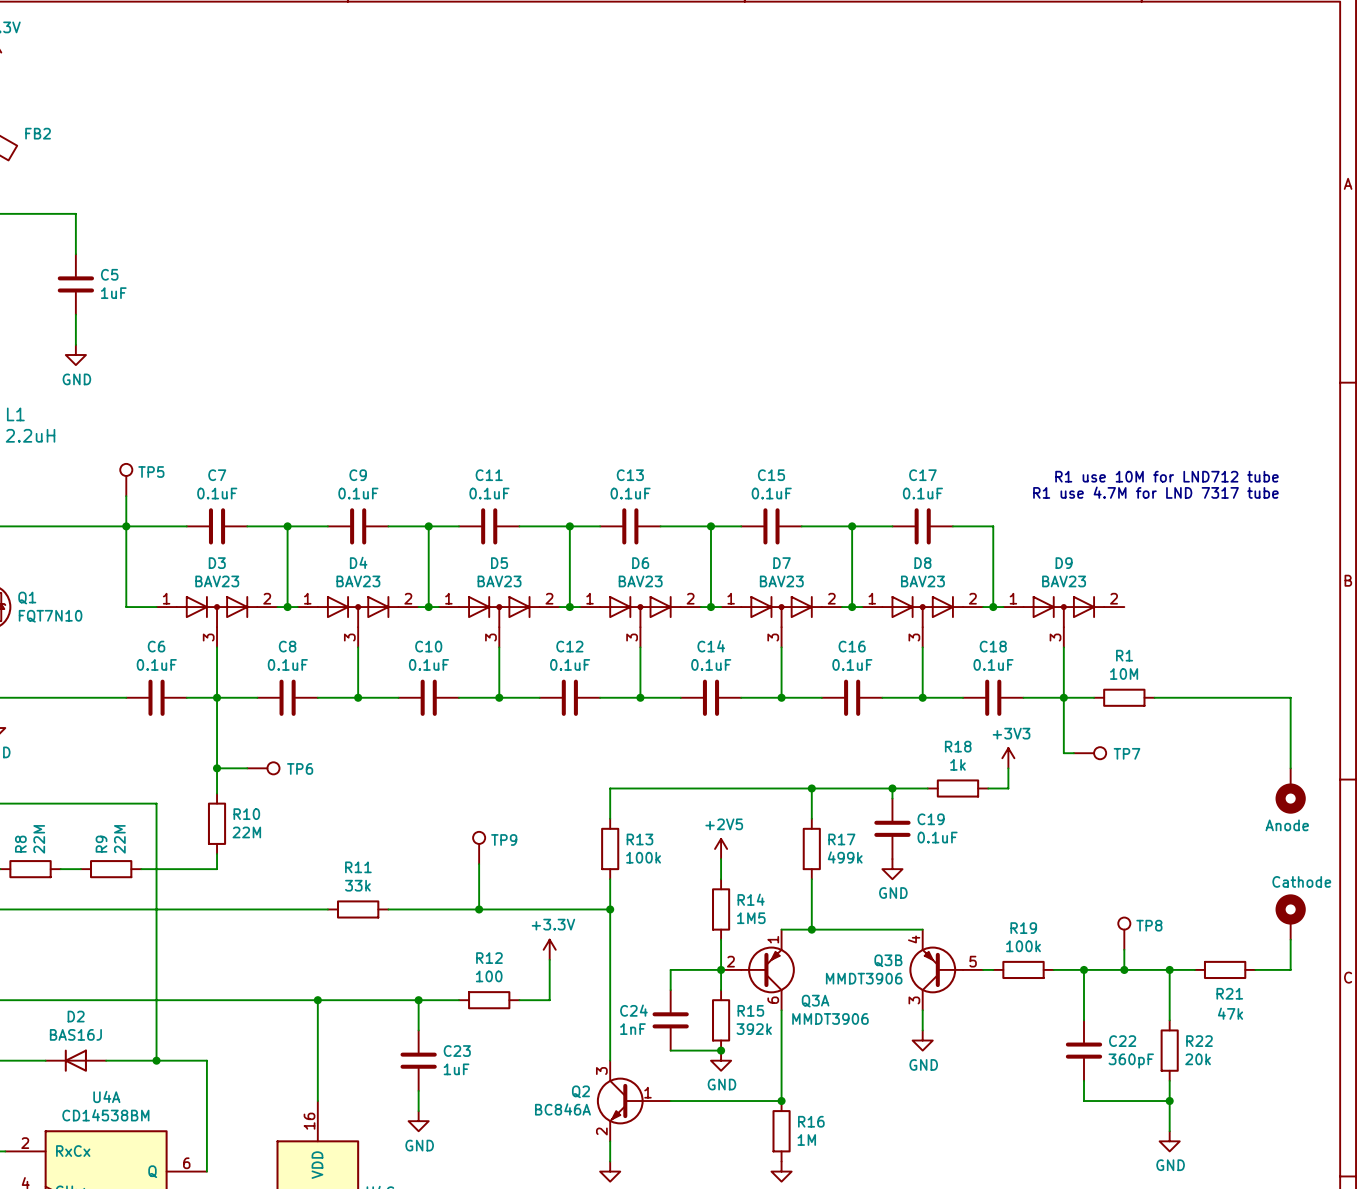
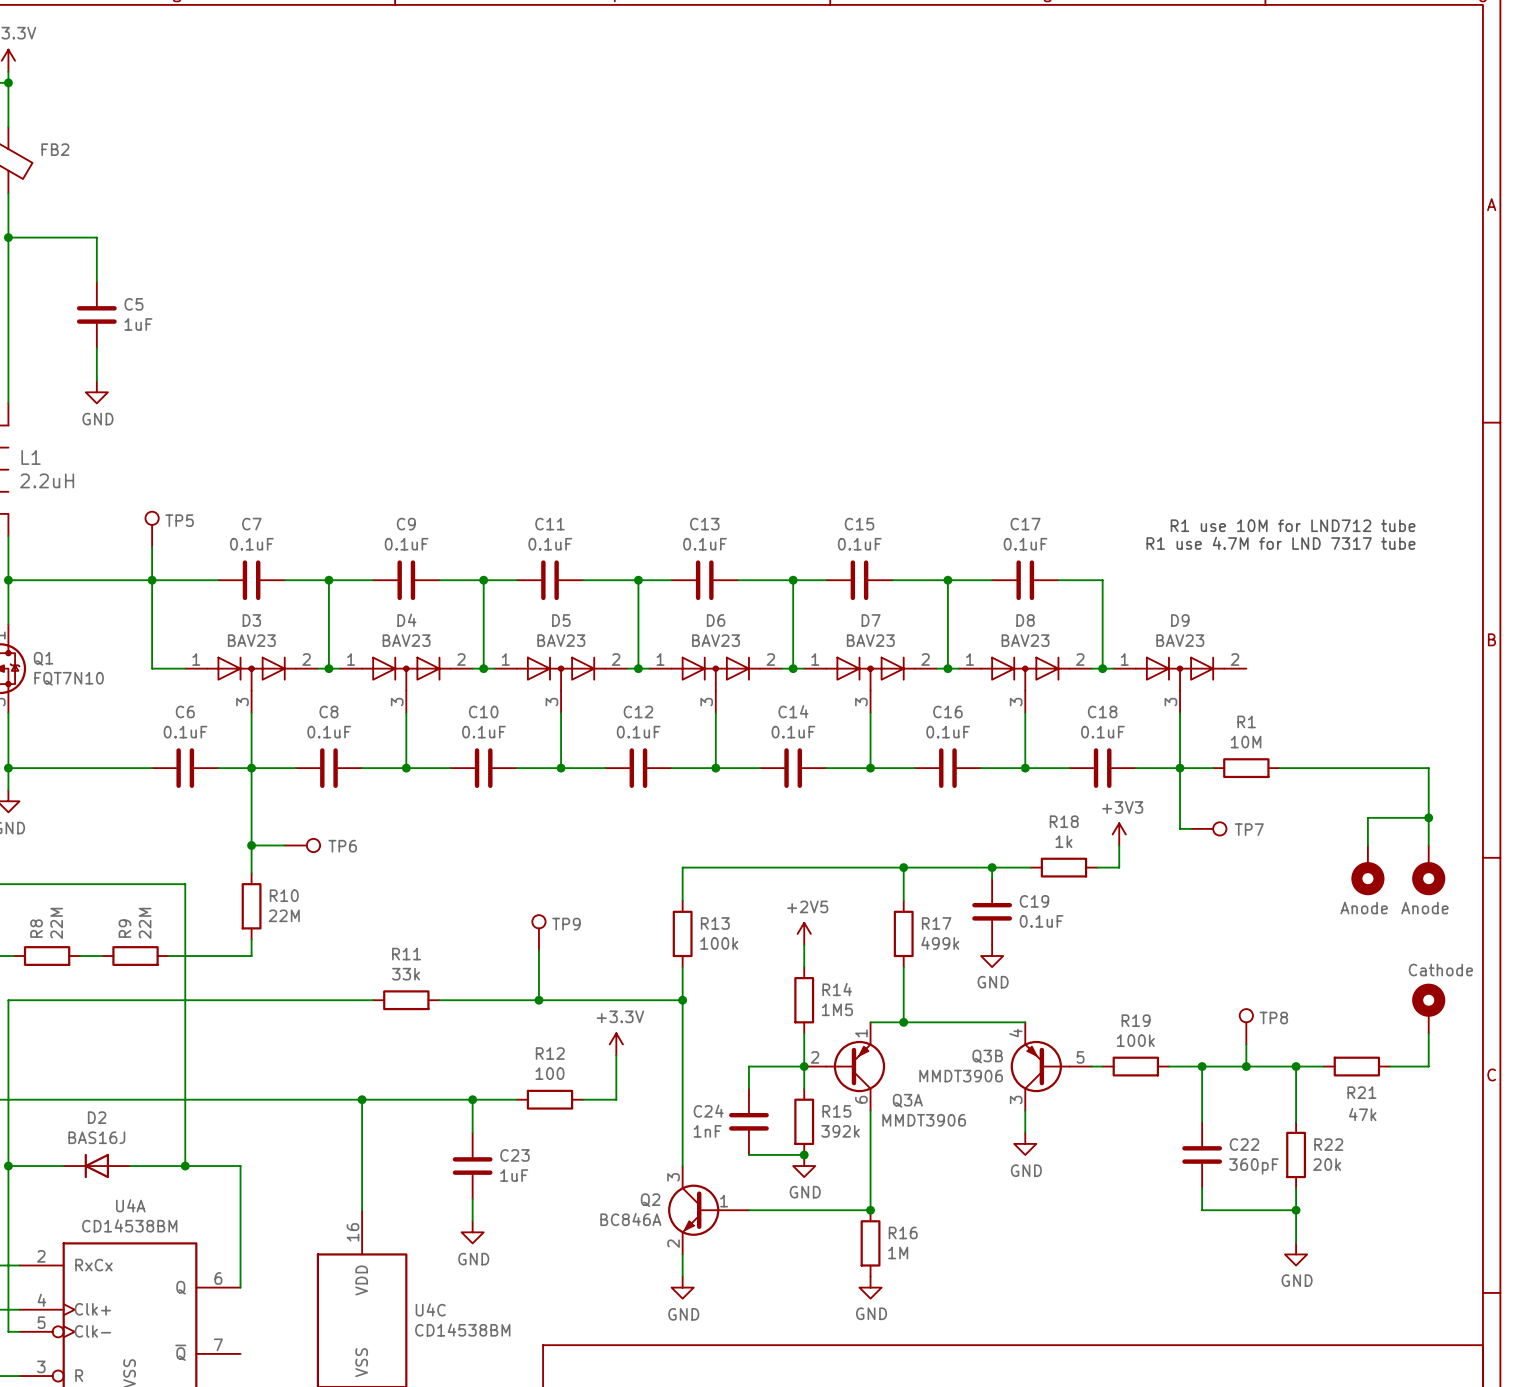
wire: none -> (1428, 817) (1367, 817) (1367, 845)
junction: none -> (1428, 817)
part: none -> Anode (1367, 870)

